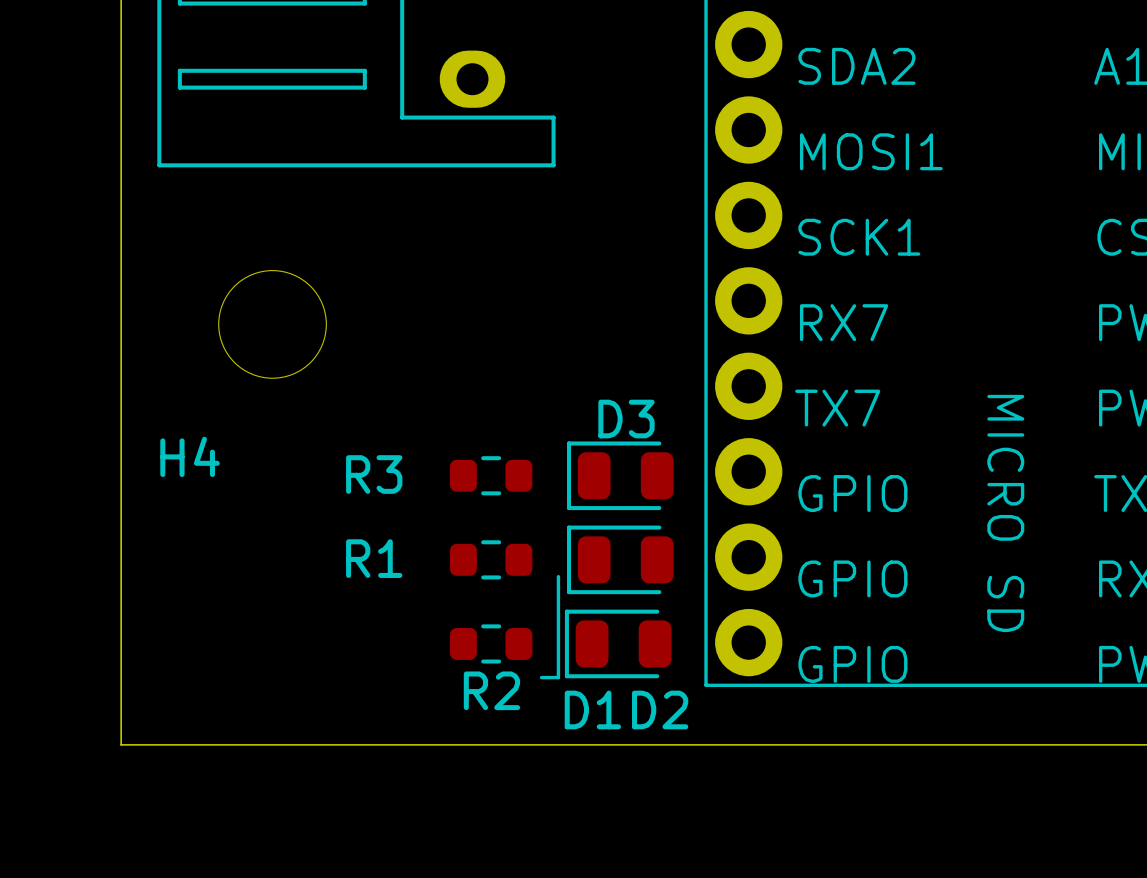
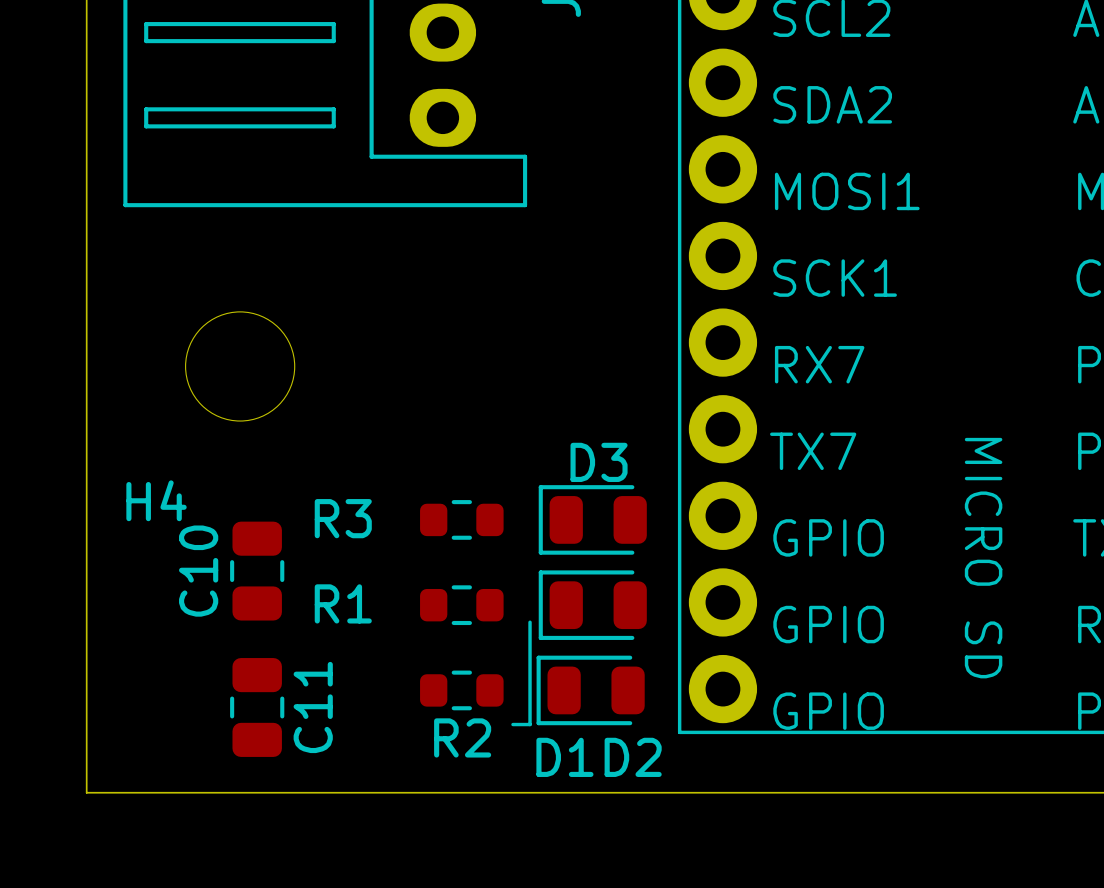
C10: none -> (257, 571)
C11: none -> (257, 707)

